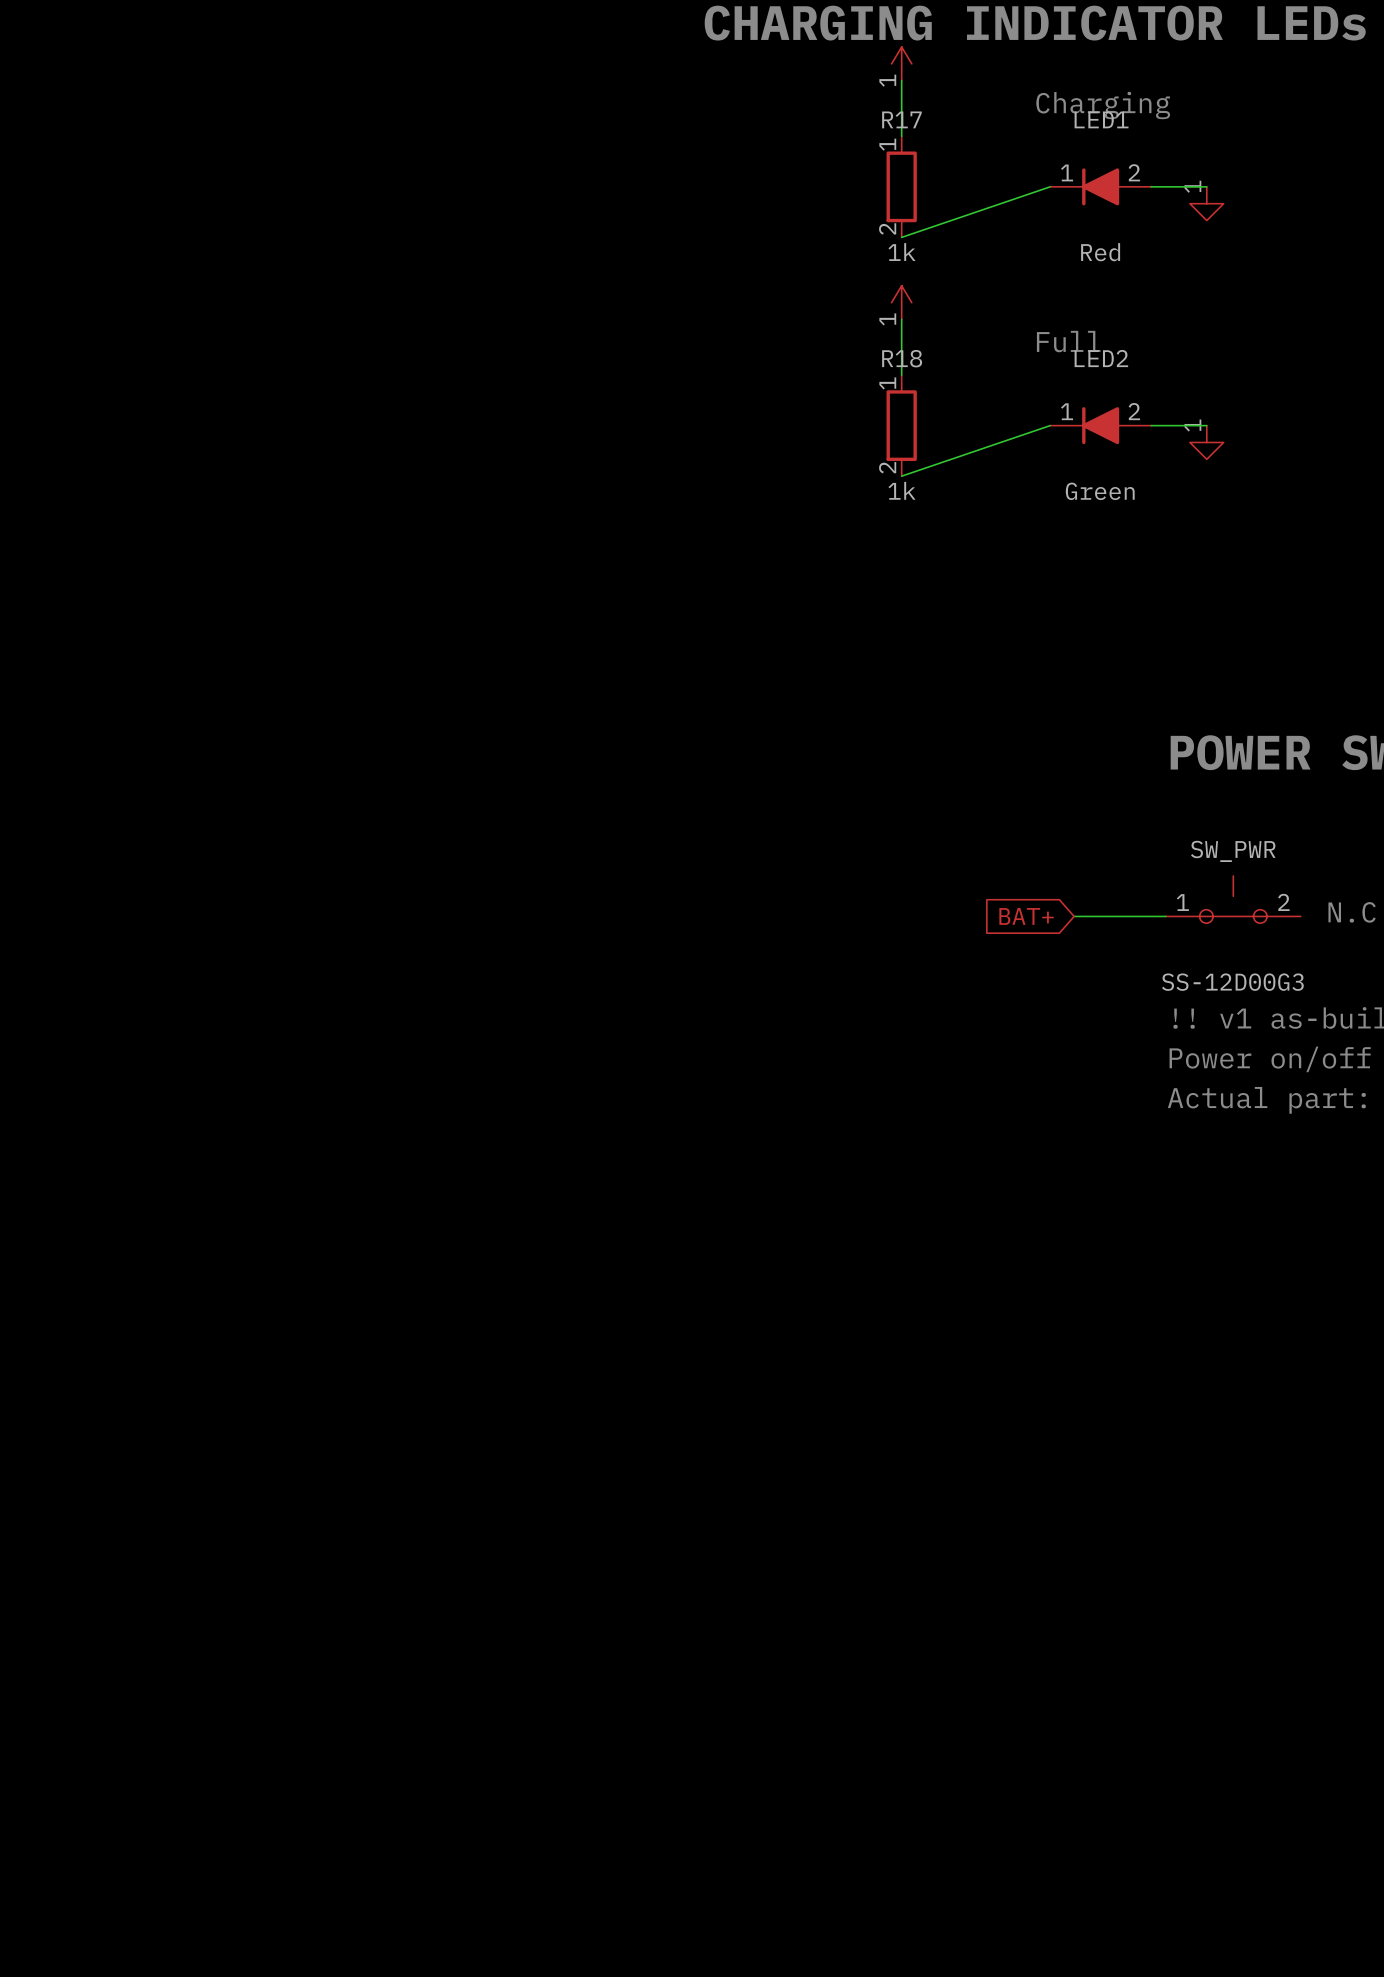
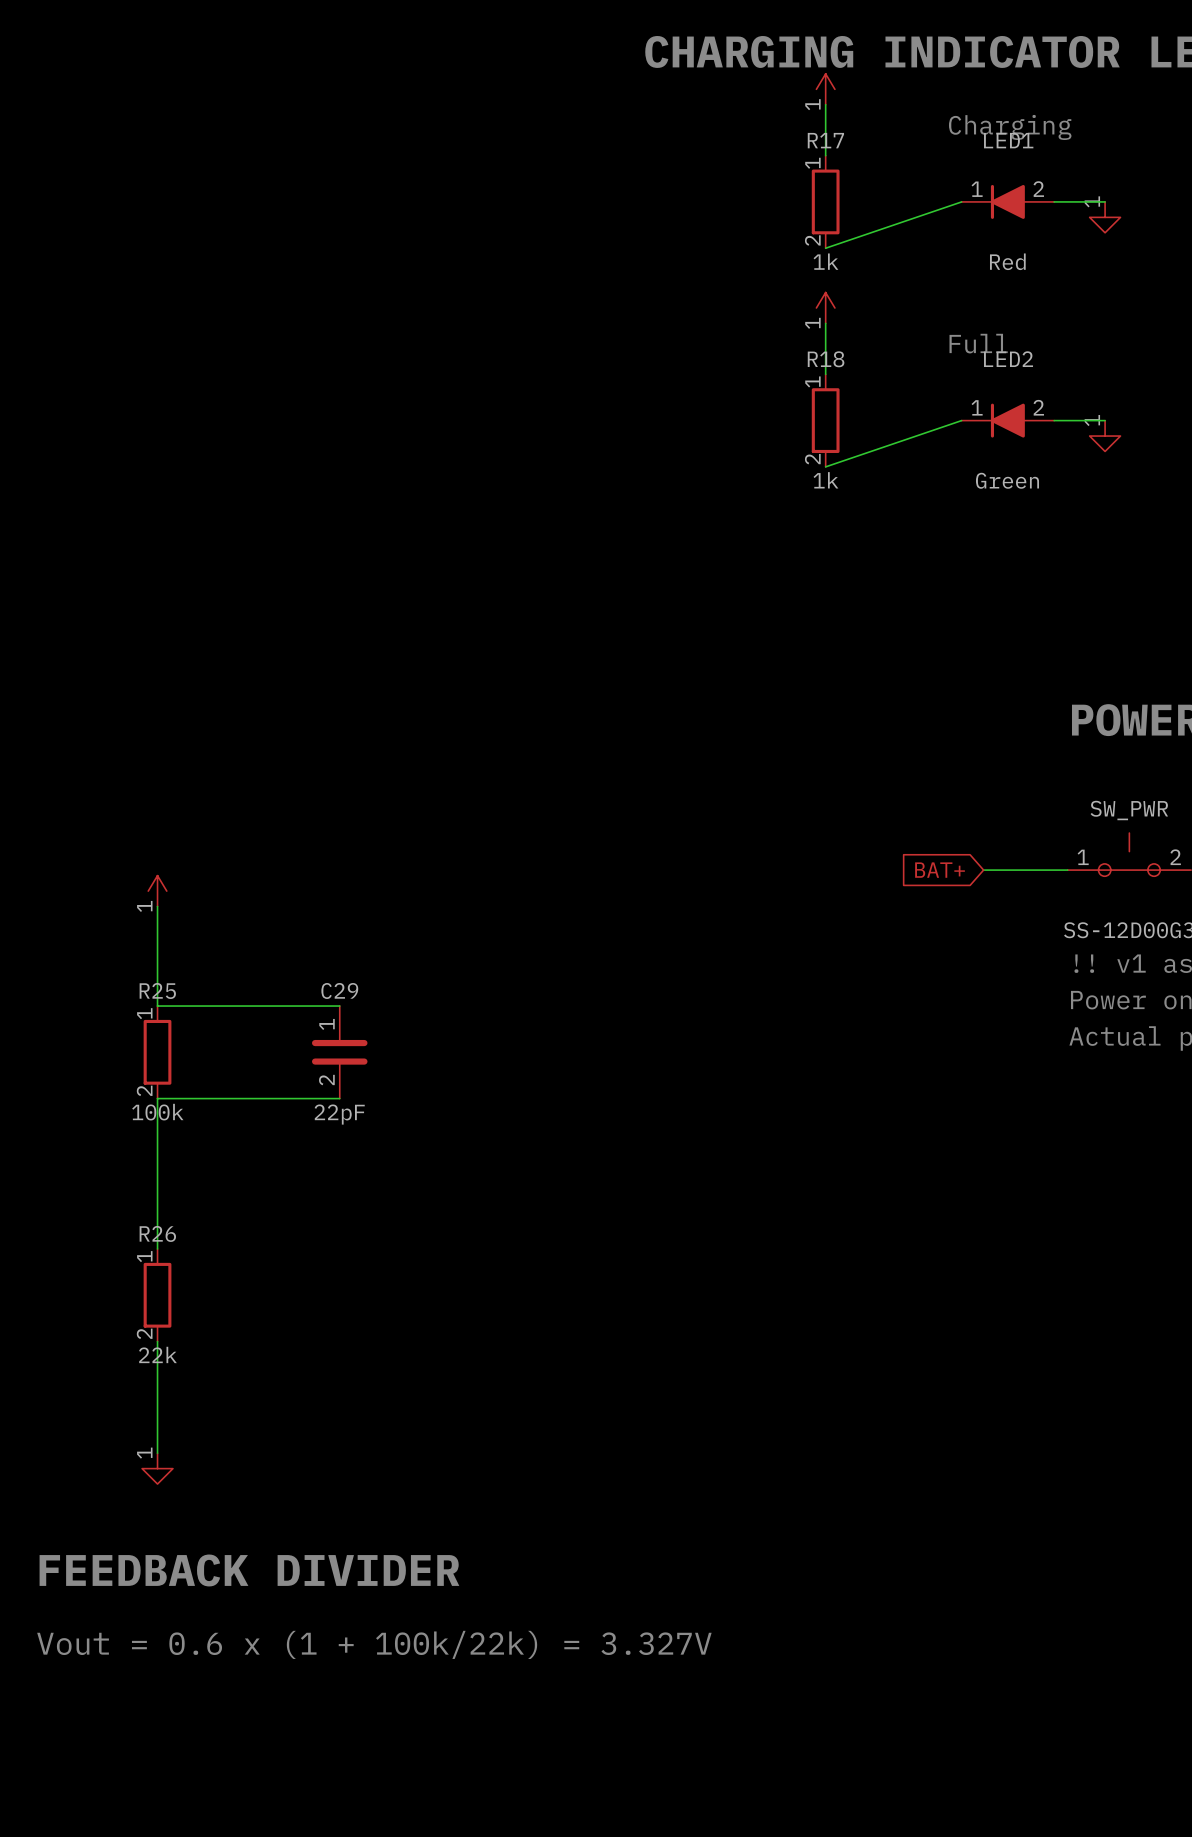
power symbol: none -> (157, 891)
wire: none -> (157, 906) (157, 1006) (339, 1006)
R25: none -> 100k (157, 1052)
C29: none -> 22pF (339, 1052)
wire: none -> (339, 1098) (157, 1098) (157, 1248)
R26: none -> 22k (157, 1295)
wire: none -> (157, 1341) (157, 1453)
power symbol: none -> (157, 1468)
text: none -> FEEDBACK DIVIDER (249, 1570)
text: none -> Vout = 0.6 x (1 + 100k/22k) = 3.327V (374, 1644)

